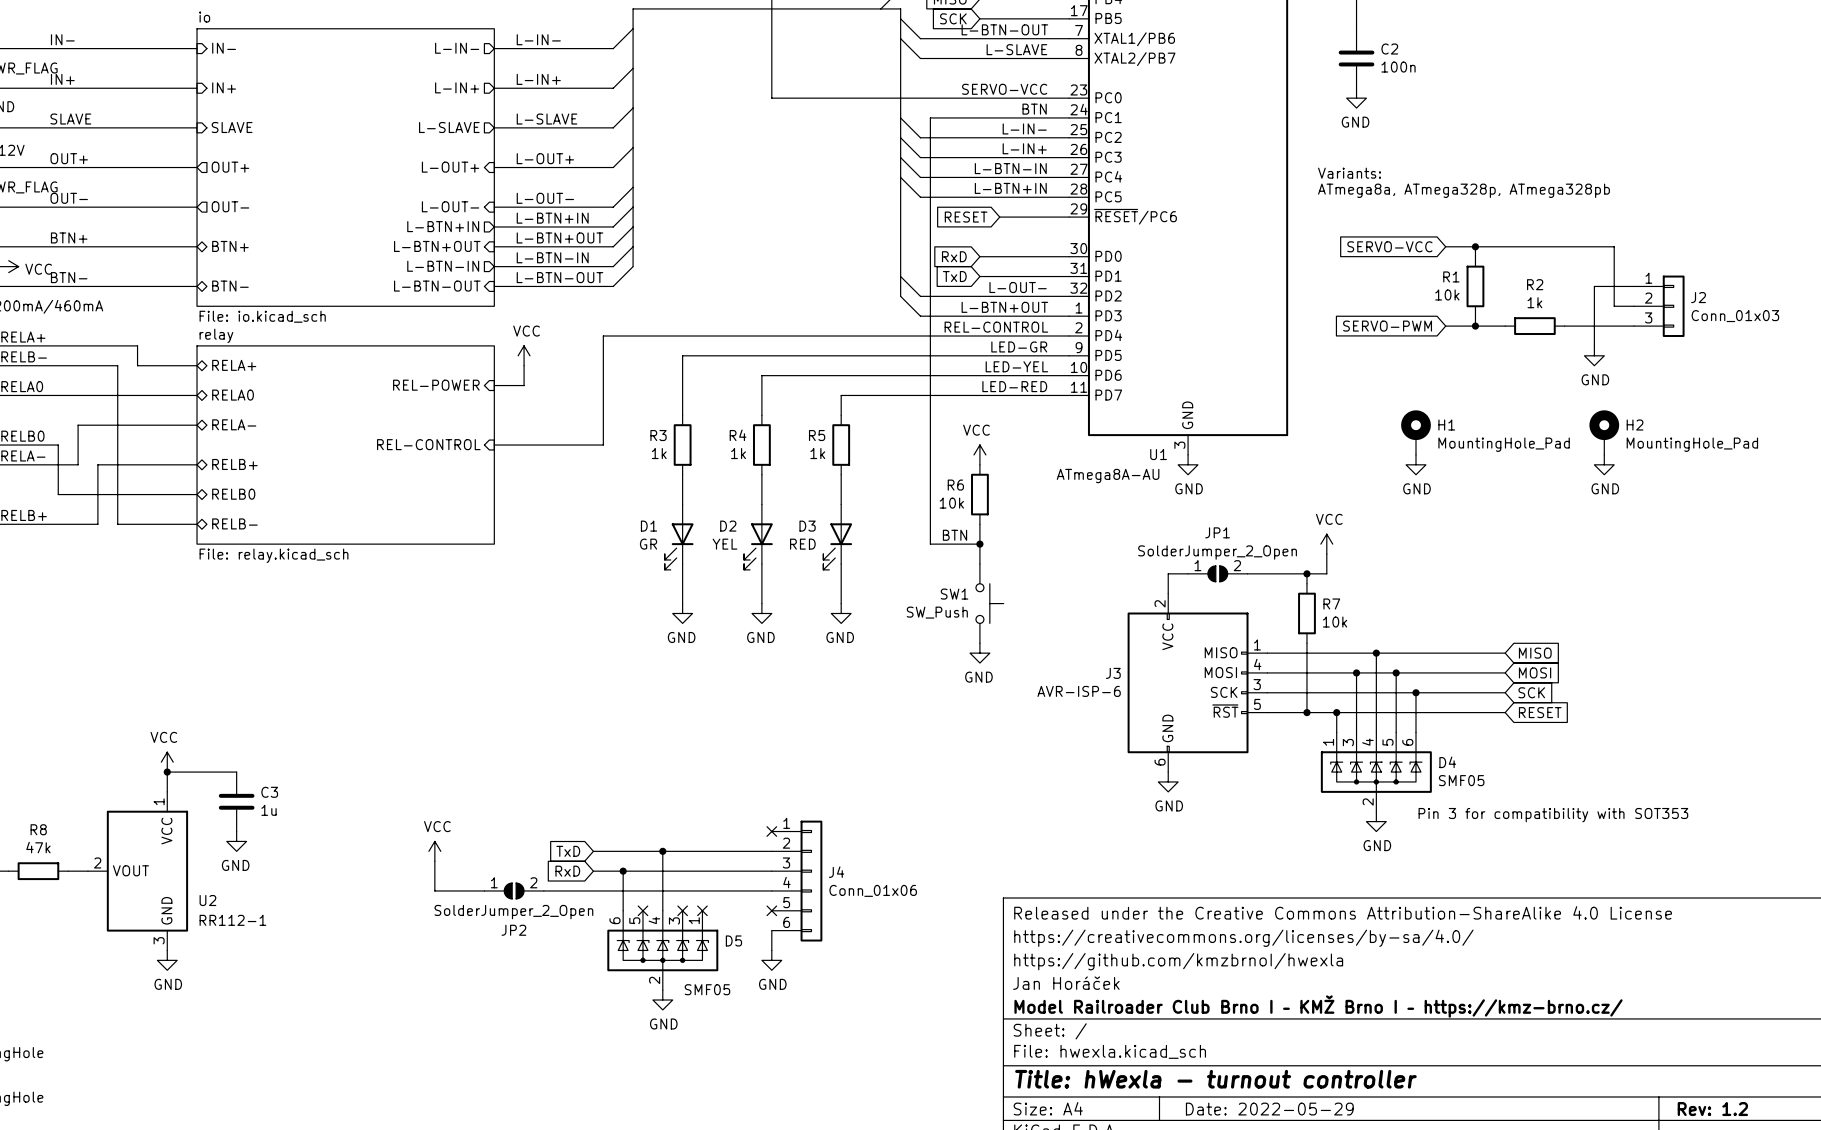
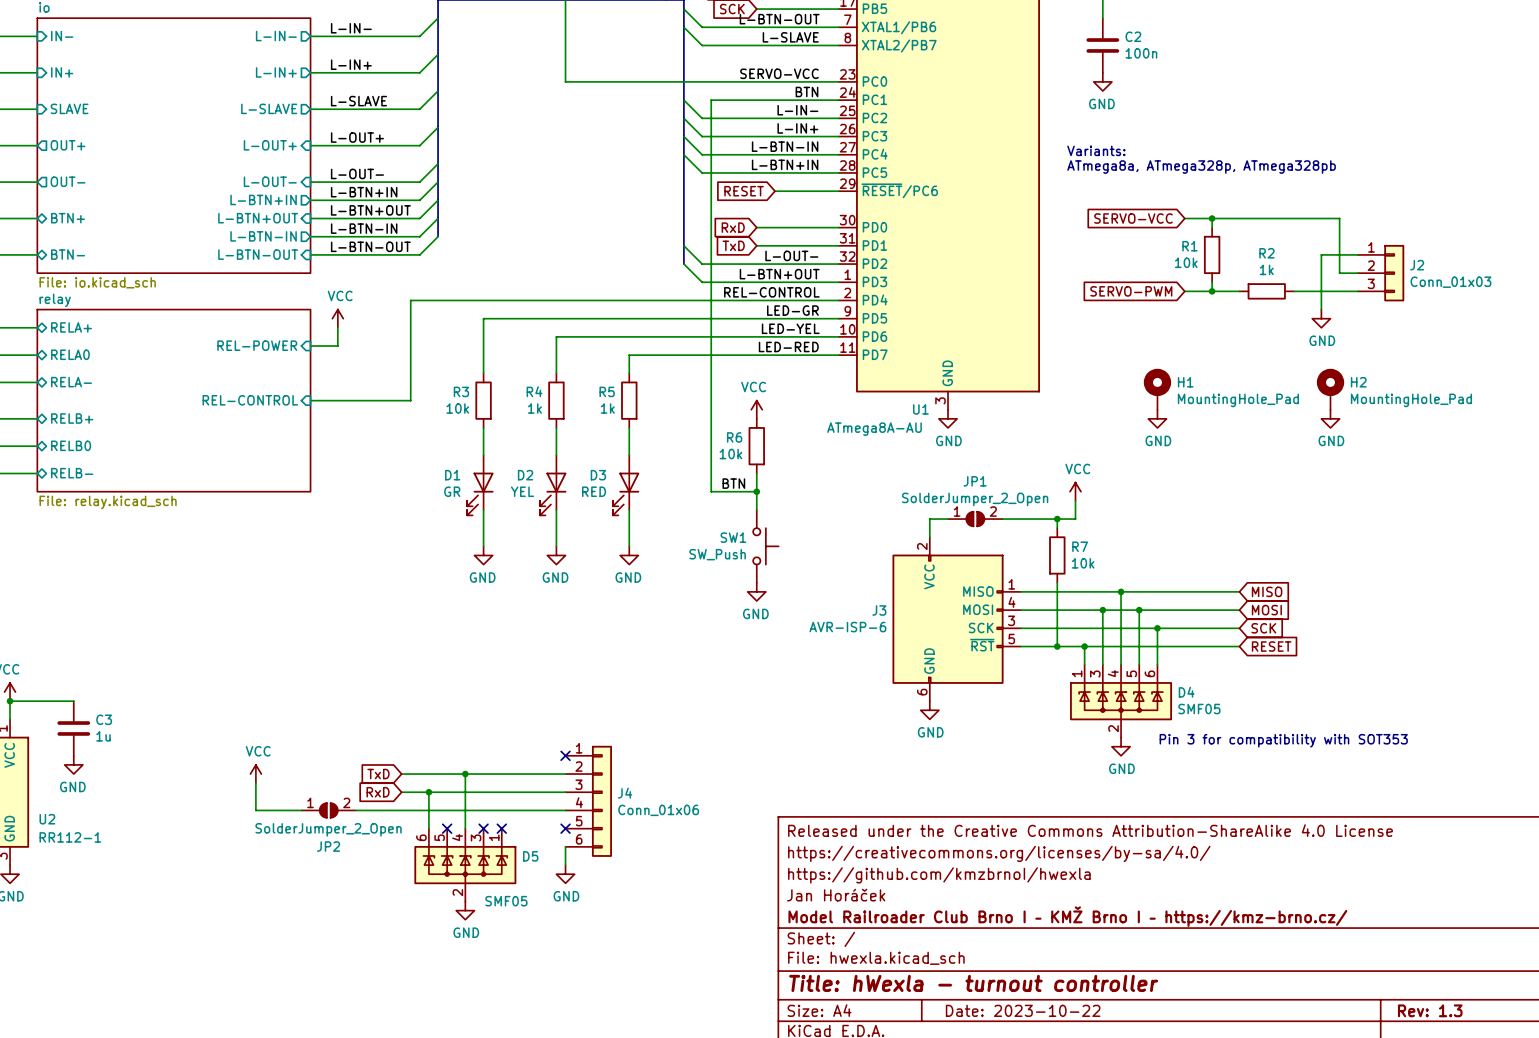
R3 value: 1k (659, 453) -> 10k (457, 408)
title block: Date: 2022-05-29 (1269, 1109) -> Date: 2023-10-22 (1023, 1010)
title block: Rev: 1.2 (1712, 1109) -> Rev: 1.3 (1430, 1010)

